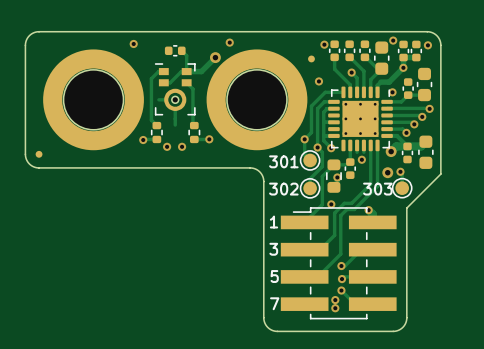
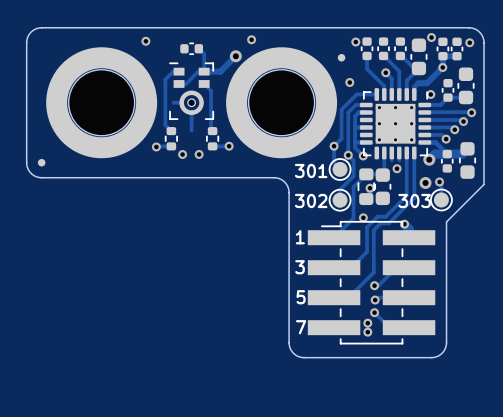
part footprint: [344, 158, 357, 179] -> [374, 168, 392, 206]

